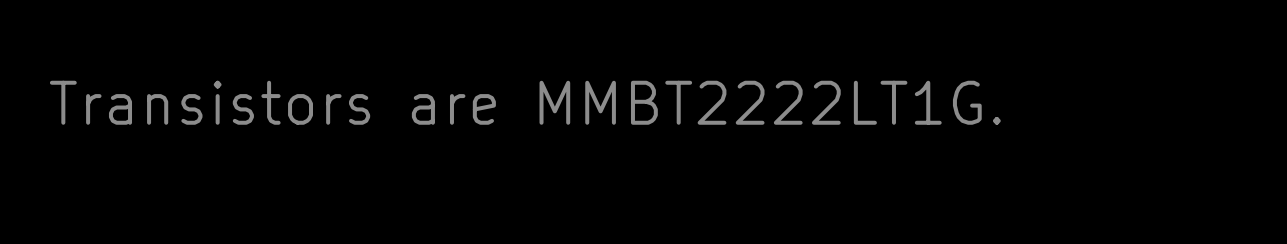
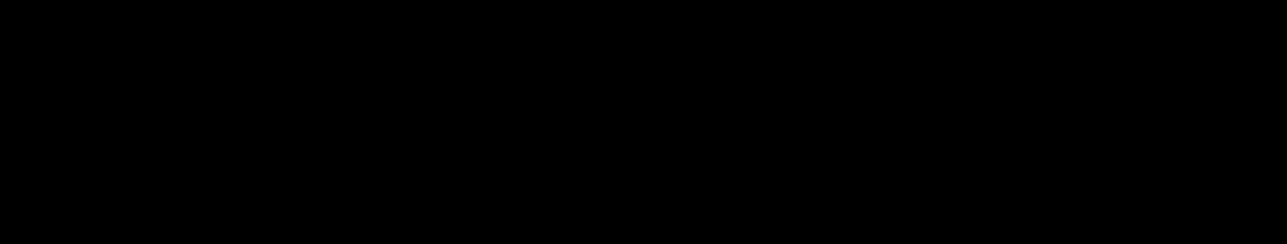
text: Transistors are MMBT2222LT1G. (525, 102) -> none

